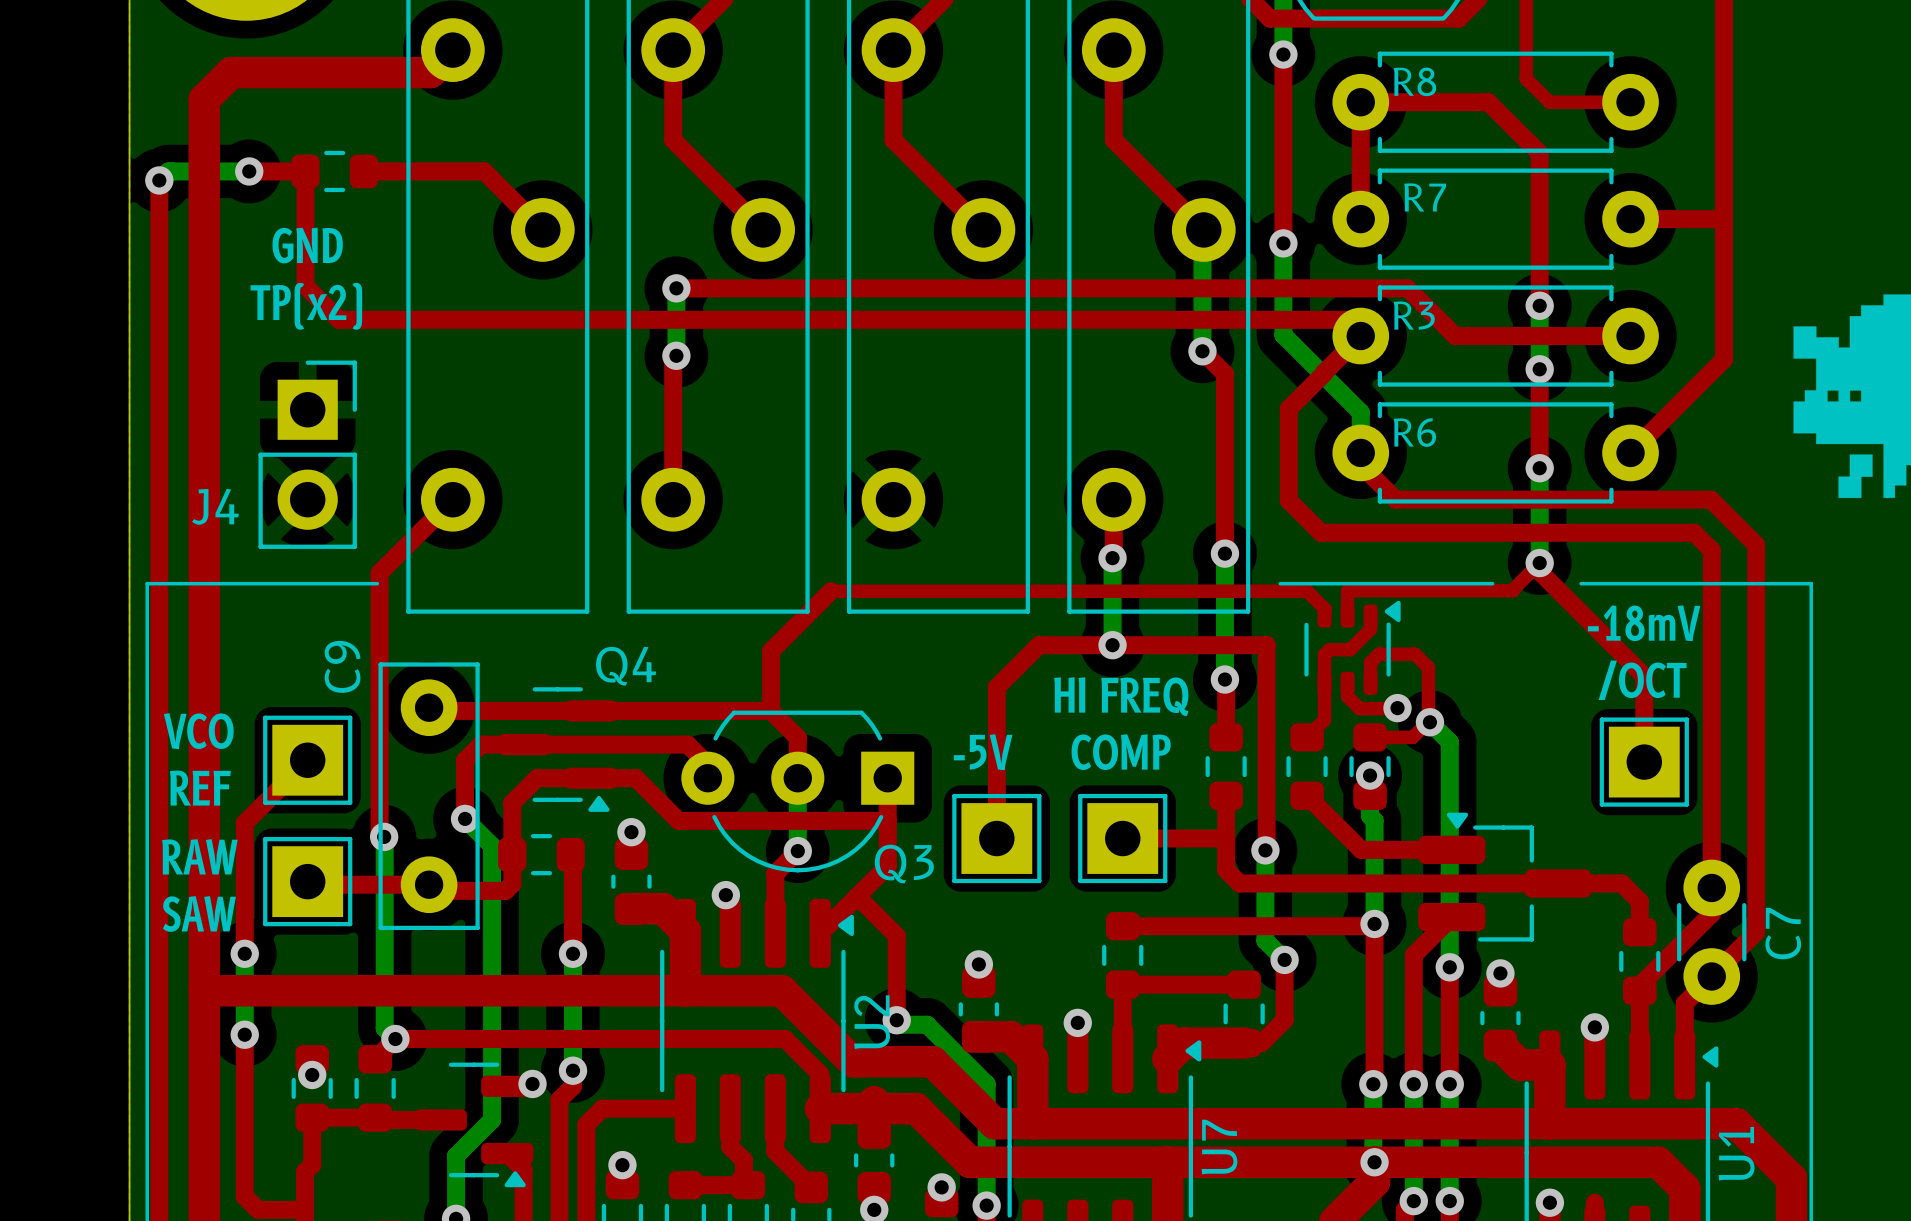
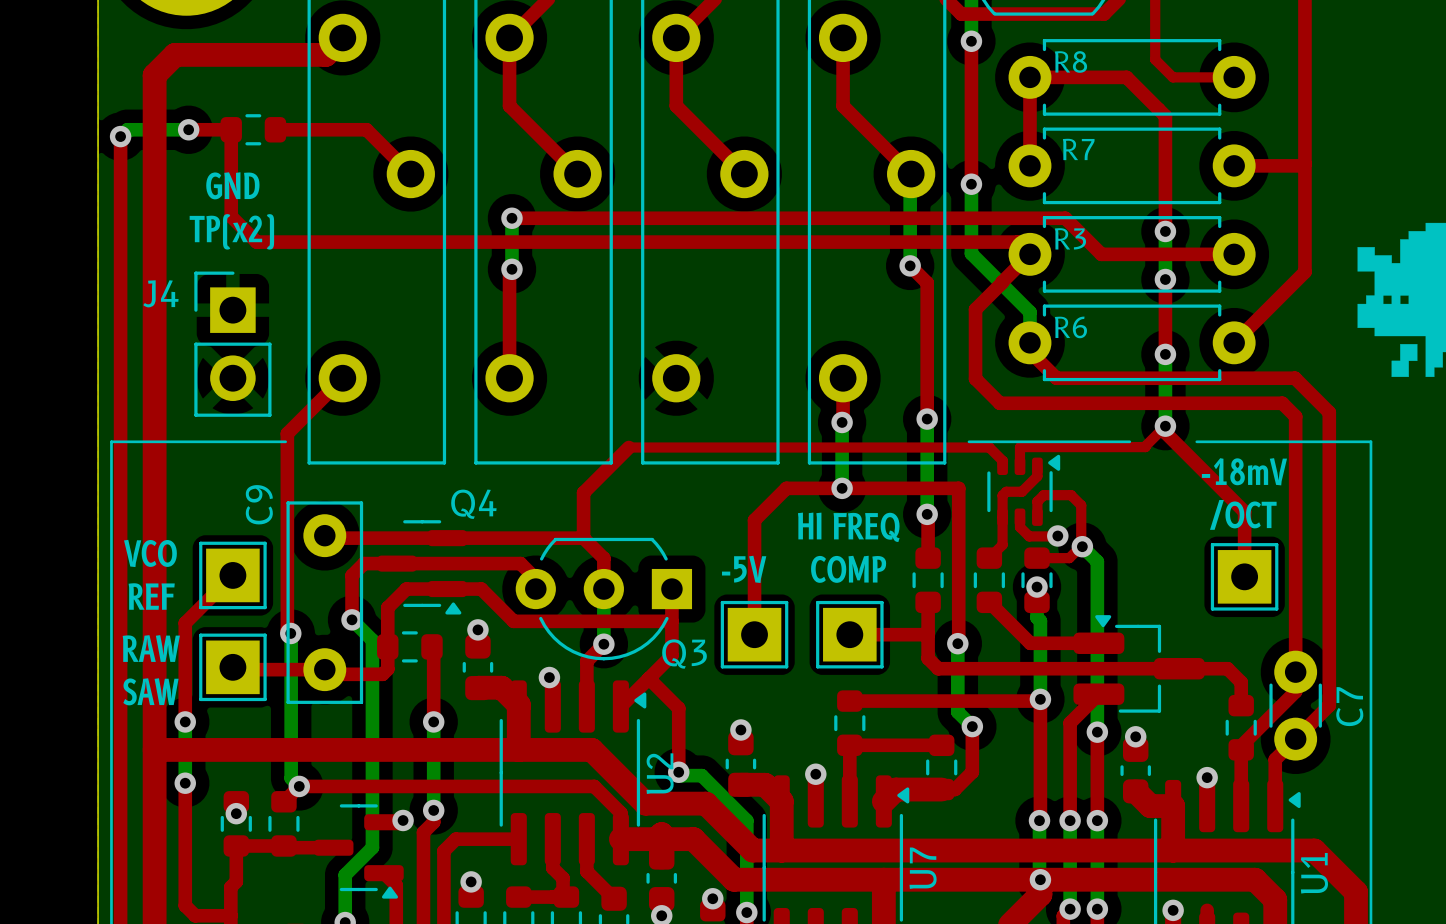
J4 footprint: [258, 360, 357, 549] -> [194, 271, 272, 417]
J4 name position: J4 (215, 506) -> J4 (160, 293)

